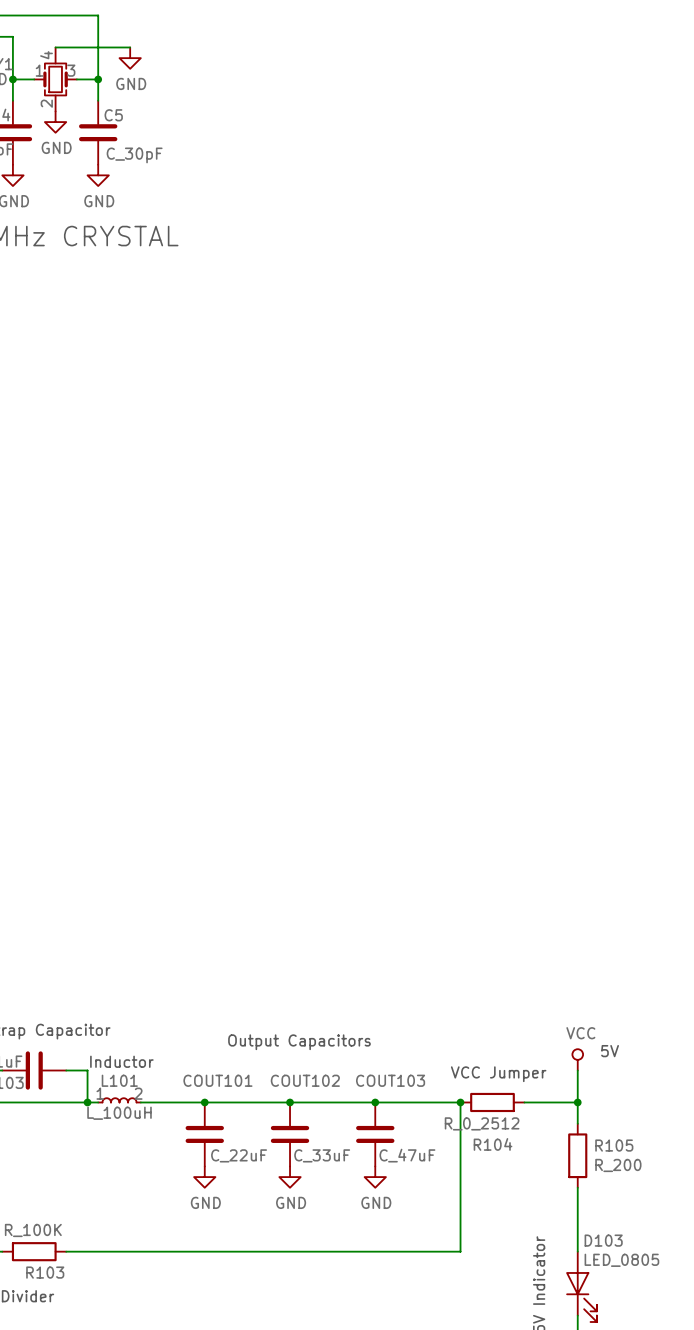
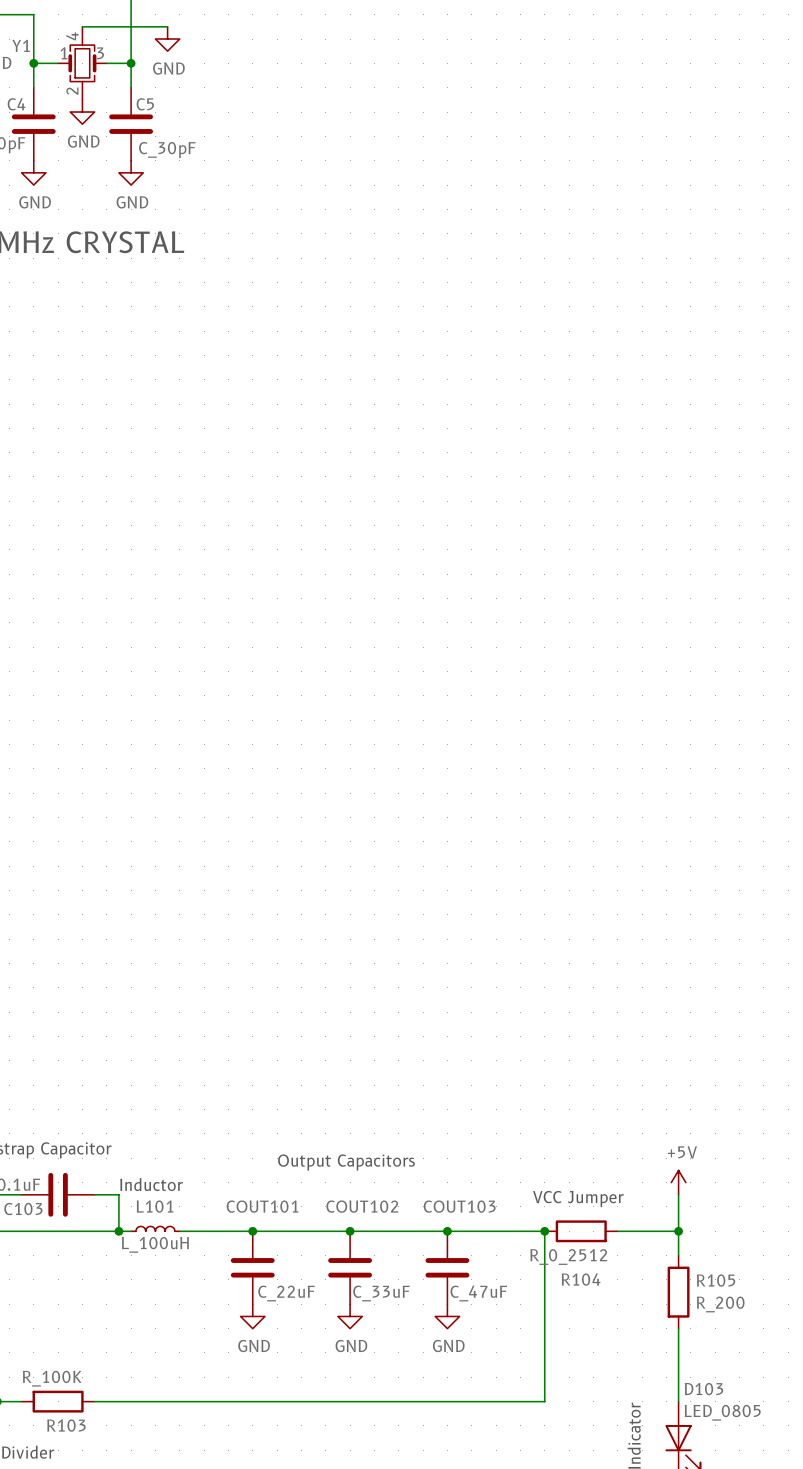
text: 5V (610, 1051) -> none
power symbol: VCC (577, 1059) -> +5V (678, 1182)
L101 pin number: 1 (100, 1093) -> none
L101 pin number: 2 (138, 1093) -> none

